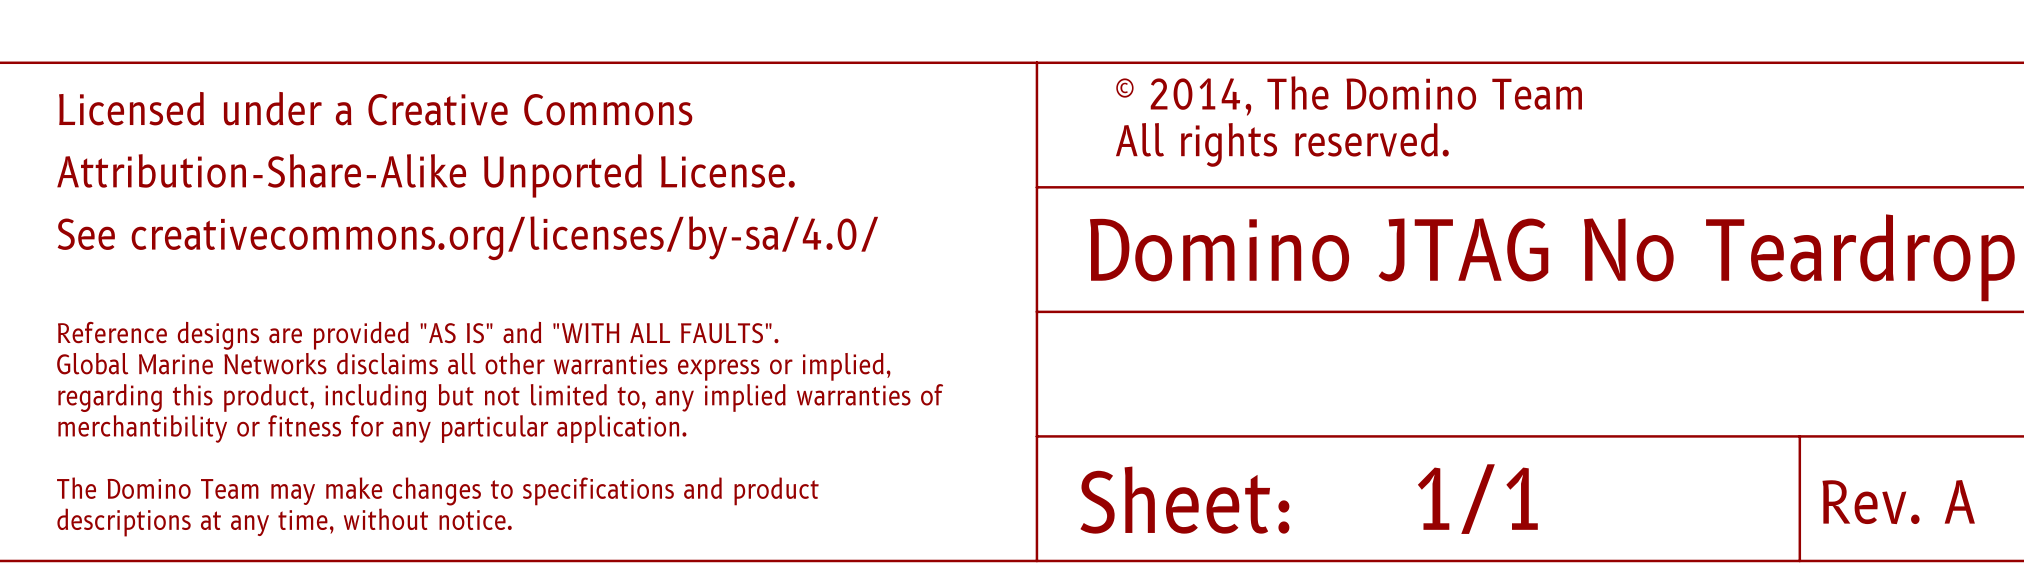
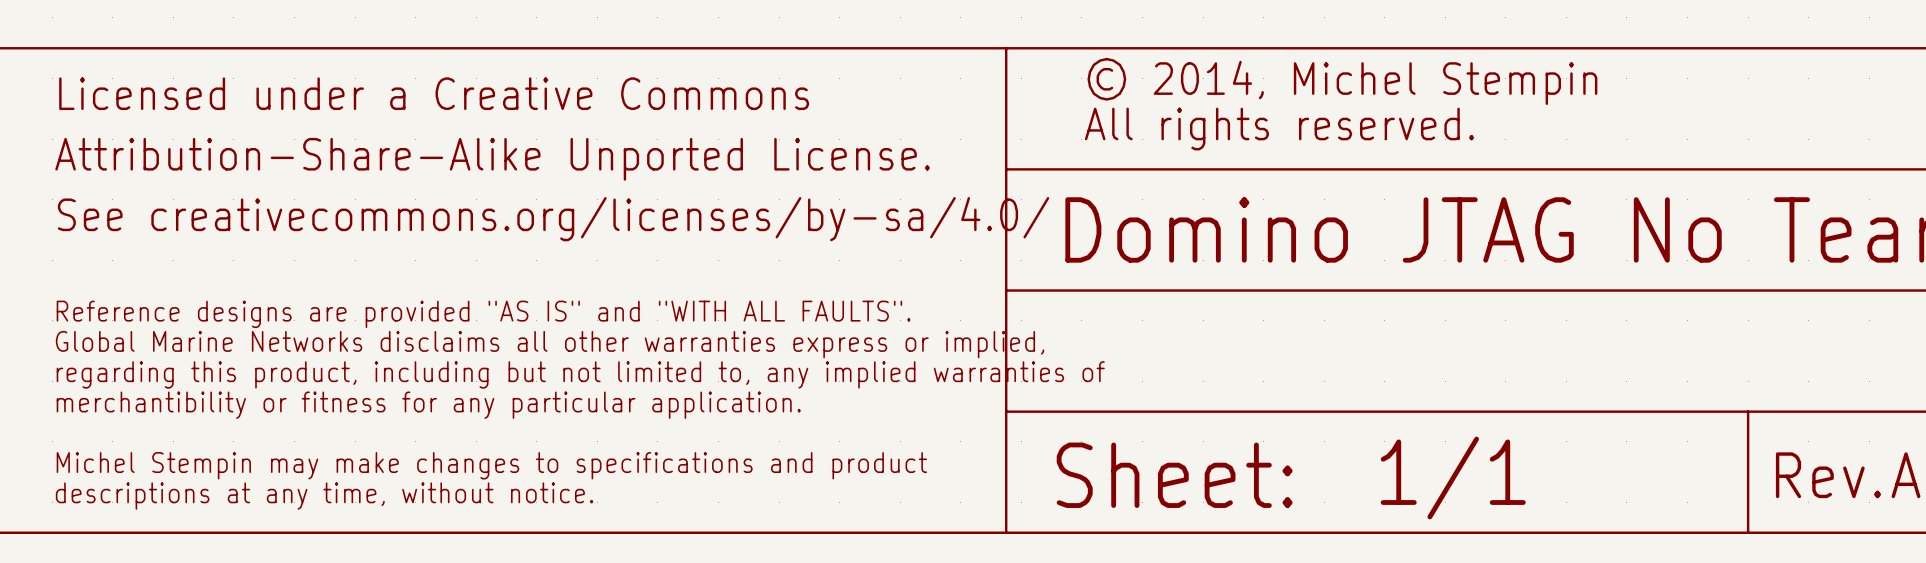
text: © 2014, The Domino Team (1349, 95) -> © 2014, Michel Stempin (1342, 81)
text: The Domino Team may make changes to specifications and product (437, 491) -> Michel Stempin may make changes to specifications and product (491, 465)

